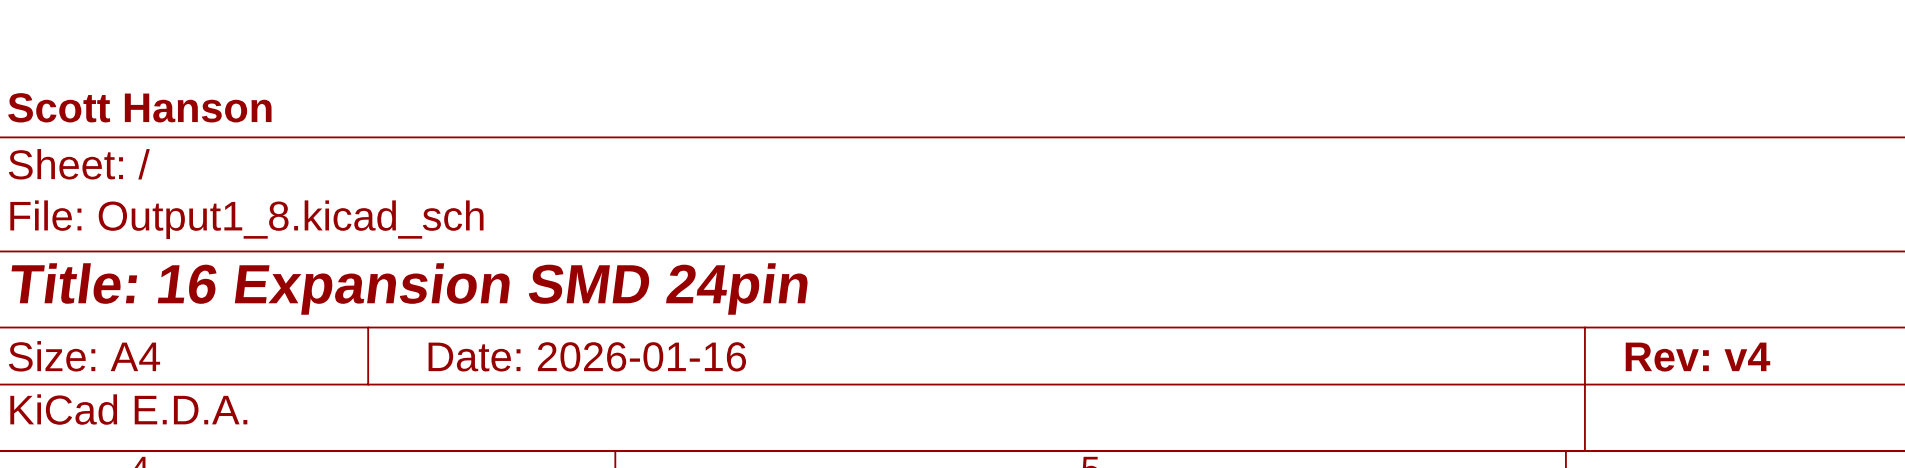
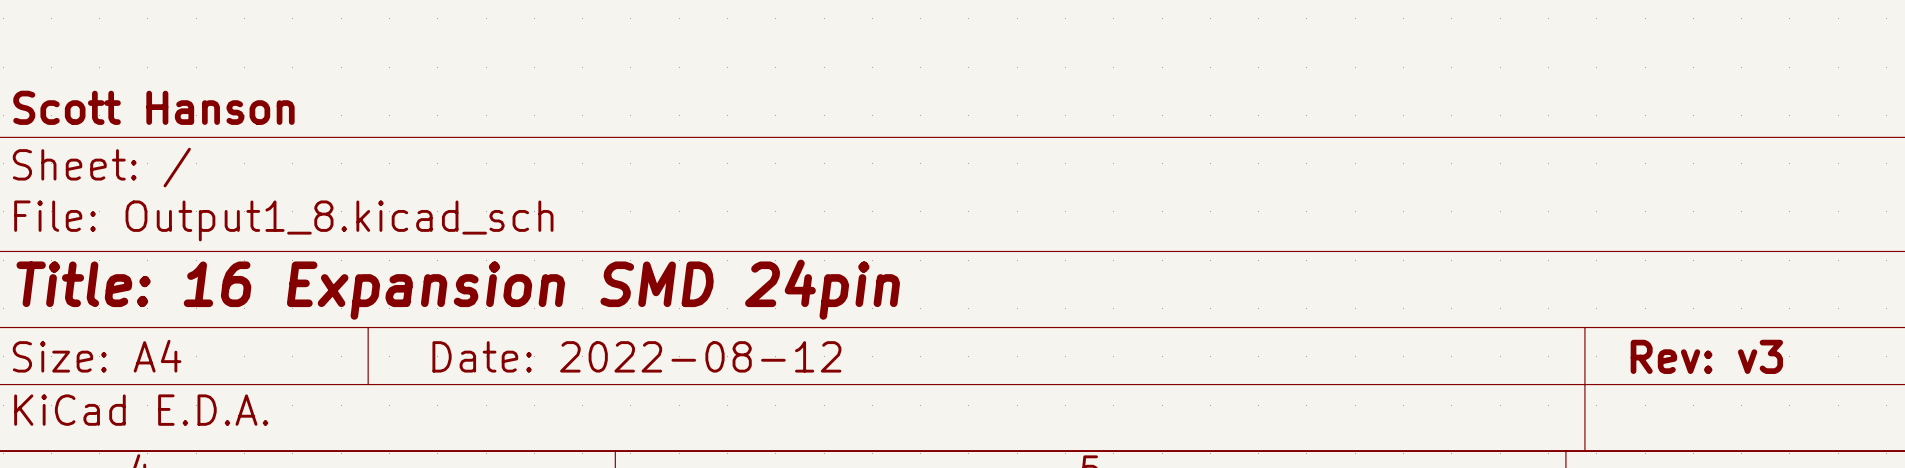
title block: Date: 2026-01-16 (587, 356) -> Date: 2022-08-12 (636, 356)
title block: Rev: v4 (1697, 357) -> Rev: v3 (1706, 356)

